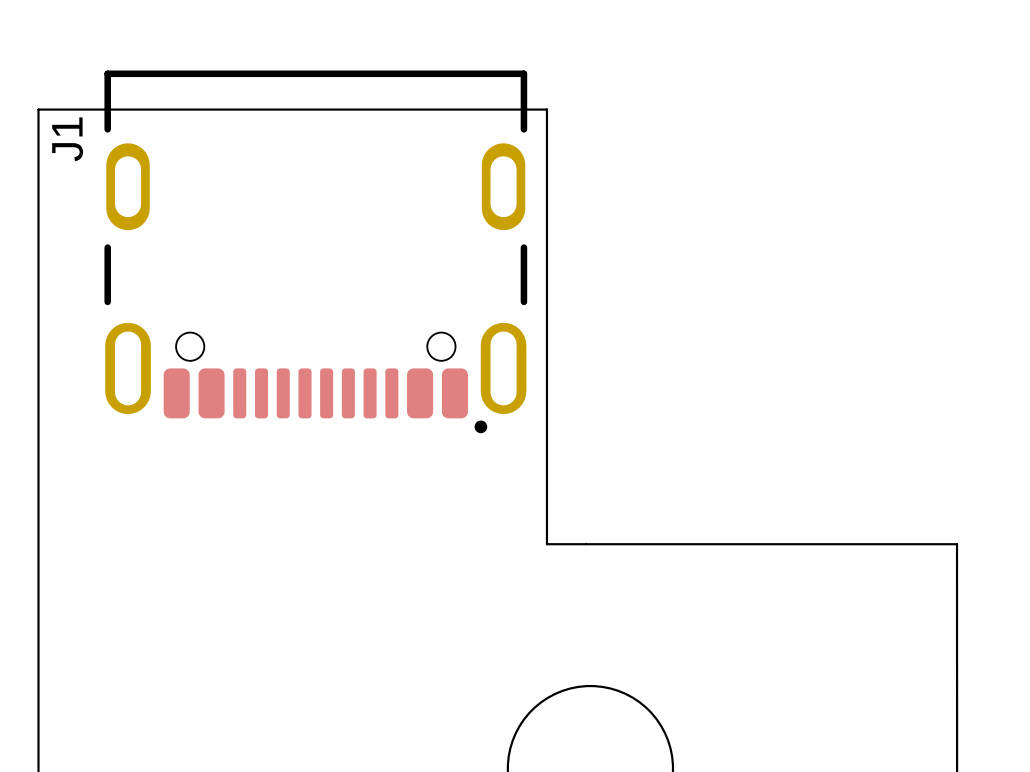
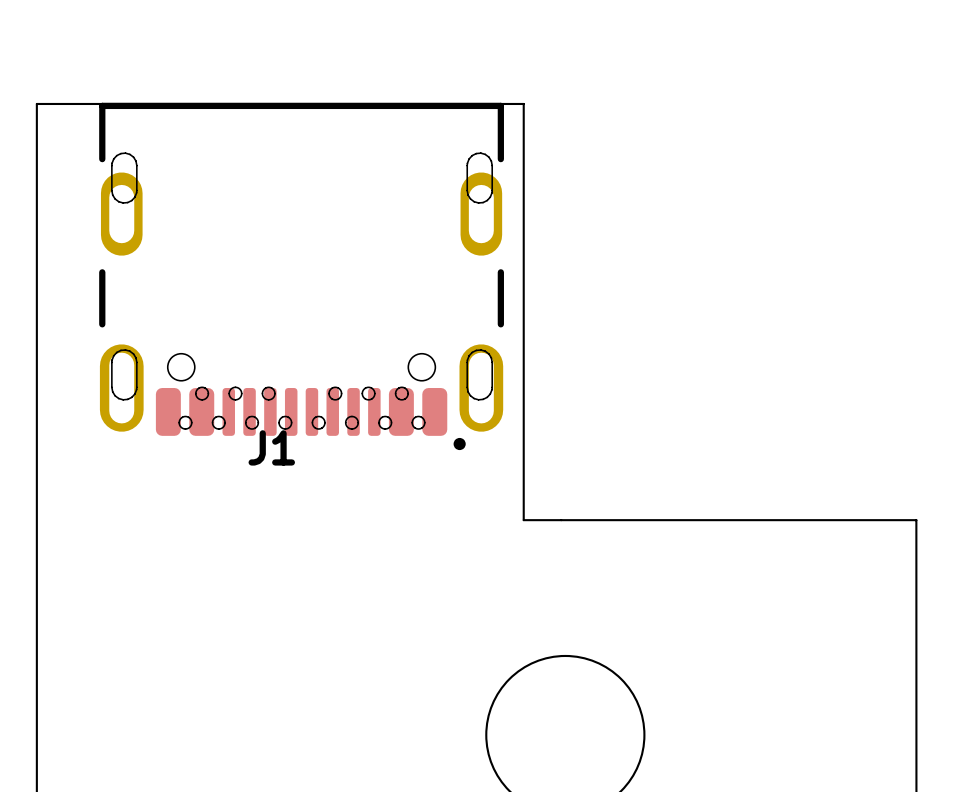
J1 name rotation: 0° (67, 139) -> 90° clockwise (271, 447)
J1 name position: J1 (67, 139) -> J1 (271, 447)
board edge: none -> (125, 153) (133, 157) (135, 161) (136, 190) (131, 200) (123, 202) (115, 198) (112, 195) (111, 165) (116, 155) (125, 153)
board edge: none -> (480, 153) (488, 157) (491, 161) (492, 190) (487, 200) (478, 202) (474, 201) (468, 195) (467, 165) (472, 155) (480, 153)
J1 position: (315, 251) -> (301, 276)
board edge: none -> (125, 349) (116, 352) (111, 362) (112, 391) (115, 395) (123, 399) (131, 397) (136, 387) (135, 357) (129, 351) (125, 349)
board edge: none -> (480, 349) (485, 351) (491, 357) (492, 387) (487, 397) (478, 399) (470, 395) (468, 391) (467, 362) (472, 352) (480, 349)
board edge: none -> (235, 387) (231, 389) (229, 393) (231, 397) (235, 399) (239, 397) (241, 393) (239, 389) (235, 387)
board edge: none -> (199, 388) (196, 391) (196, 396) (200, 399) (205, 399) (208, 395) (207, 390) (203, 387) (199, 388)
board edge: none -> (265, 388) (262, 391) (263, 396) (266, 399) (271, 399) (274, 395) (274, 390) (270, 387) (265, 388)
board edge: none -> (332, 388) (329, 391) (329, 396) (333, 399) (338, 398) (341, 395) (340, 390) (336, 387) (332, 388)
board edge: none -> (365, 388) (370, 387) (373, 390) (374, 395) (371, 398) (366, 399) (363, 396) (362, 391) (365, 388)
board edge: none -> (398, 388) (403, 387) (407, 390) (407, 395) (404, 398) (400, 399) (396, 396) (395, 391) (398, 388)
board edge: none -> (351, 416) (347, 418) (345, 422) (347, 427) (351, 428) (356, 427) (358, 422) (356, 418) (351, 416)
board edge: none -> (182, 417) (179, 421) (179, 425) (183, 428) (188, 428) (191, 424) (190, 419) (187, 416) (182, 417)
board edge: none -> (215, 417) (212, 421) (213, 425) (216, 428) (221, 428) (224, 424) (224, 419) (220, 416) (215, 417)
board edge: none -> (248, 417) (253, 416) (257, 419) (258, 424) (255, 428) (250, 428) (246, 425) (246, 421) (248, 417)
board edge: none -> (282, 417) (286, 416) (290, 419) (291, 424) (288, 428) (283, 428) (279, 425) (279, 421) (282, 417)
board edge: none -> (315, 417) (320, 416) (324, 419) (324, 424) (321, 428) (317, 428) (313, 425) (312, 421) (315, 417)
board edge: none -> (382, 417) (379, 421) (379, 425) (383, 428) (388, 428) (391, 424) (390, 419) (386, 416) (382, 417)
board edge: none -> (415, 417) (420, 416) (423, 419) (424, 424) (421, 428) (416, 428) (413, 425) (412, 421) (415, 417)

